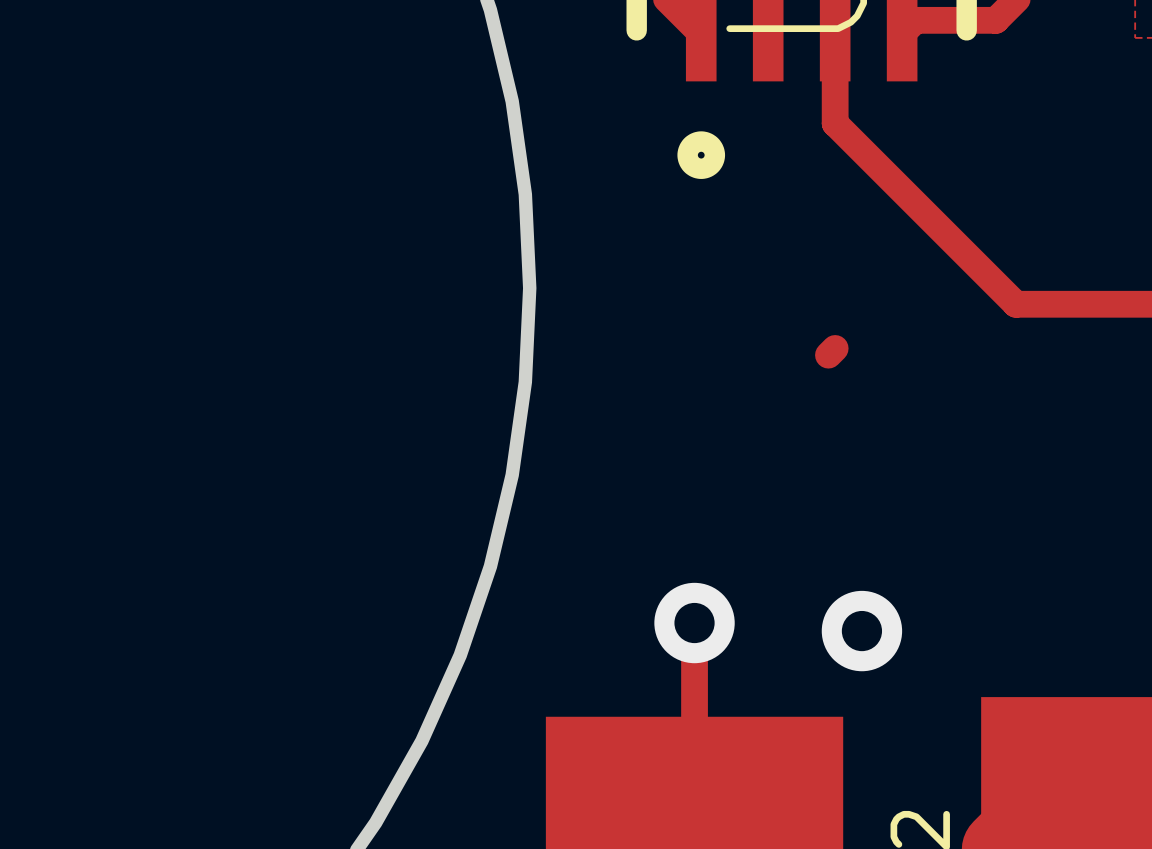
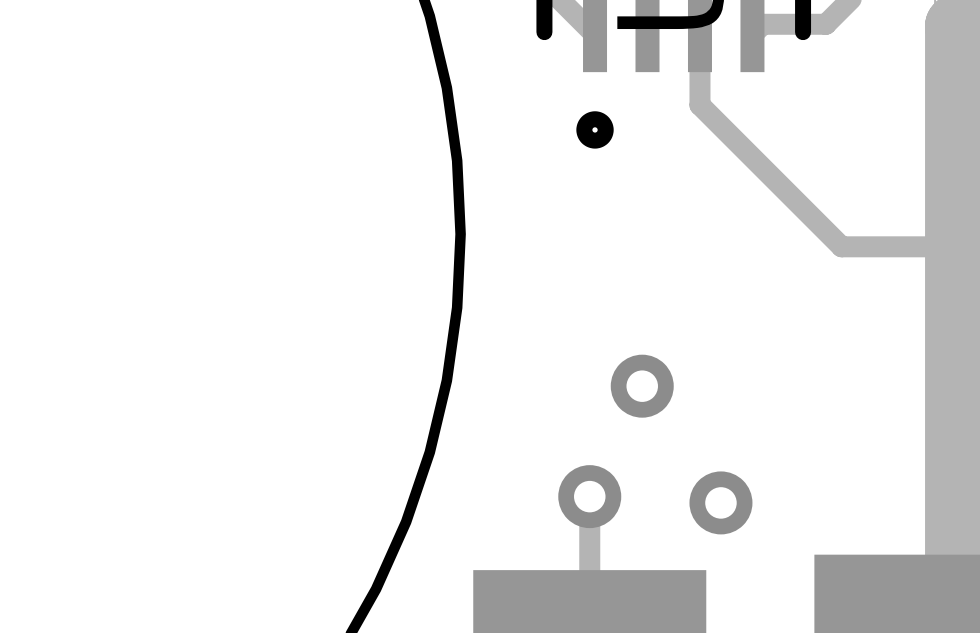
track: (835, 348) (828, 355) -> none
via: none -> (642, 386)

